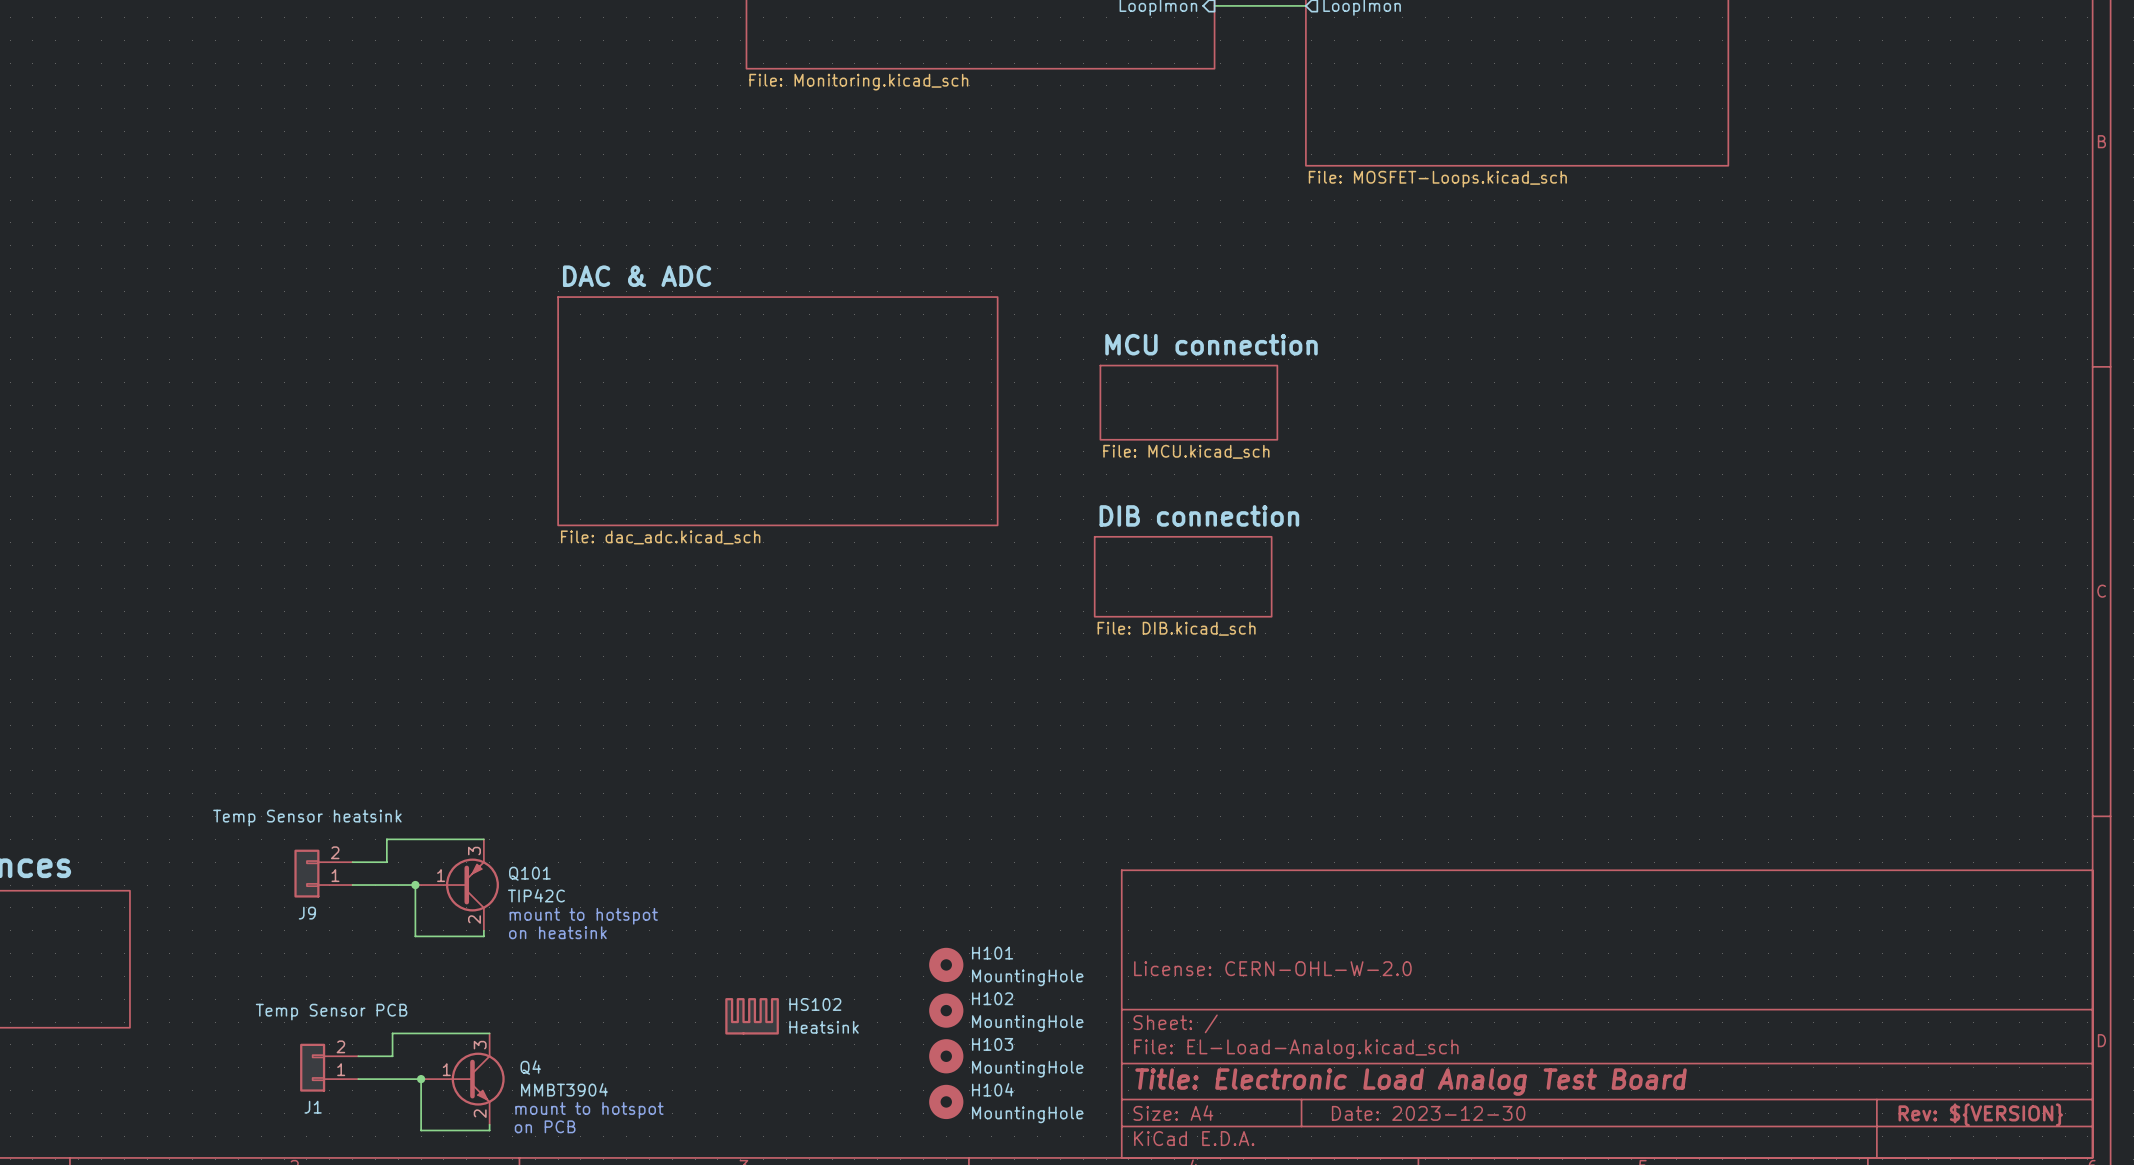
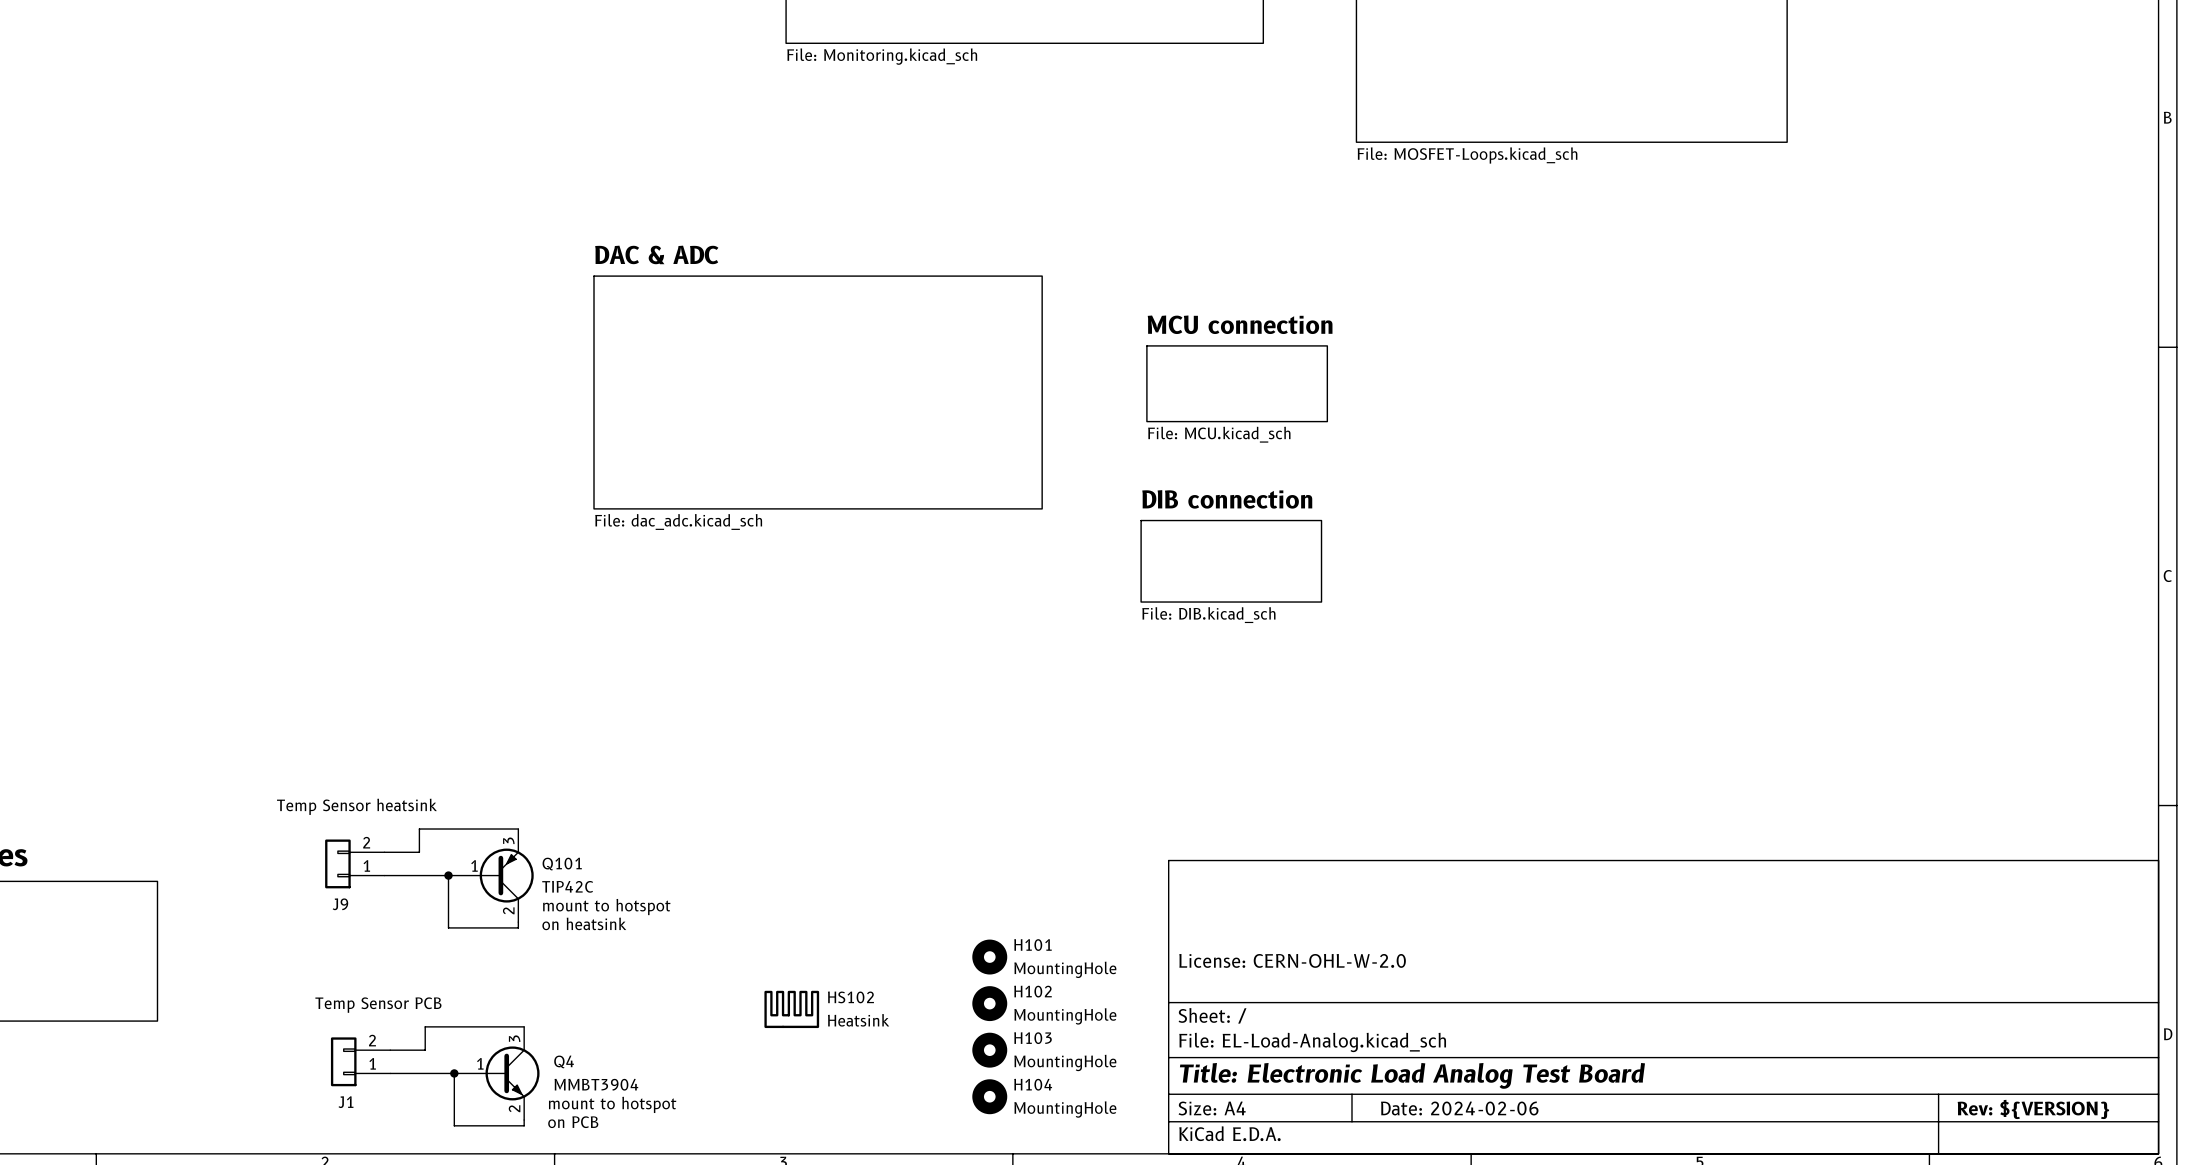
title block: Date: 2023-12-30 (1428, 1113) -> Date: 2024-02-06 (1459, 1108)

